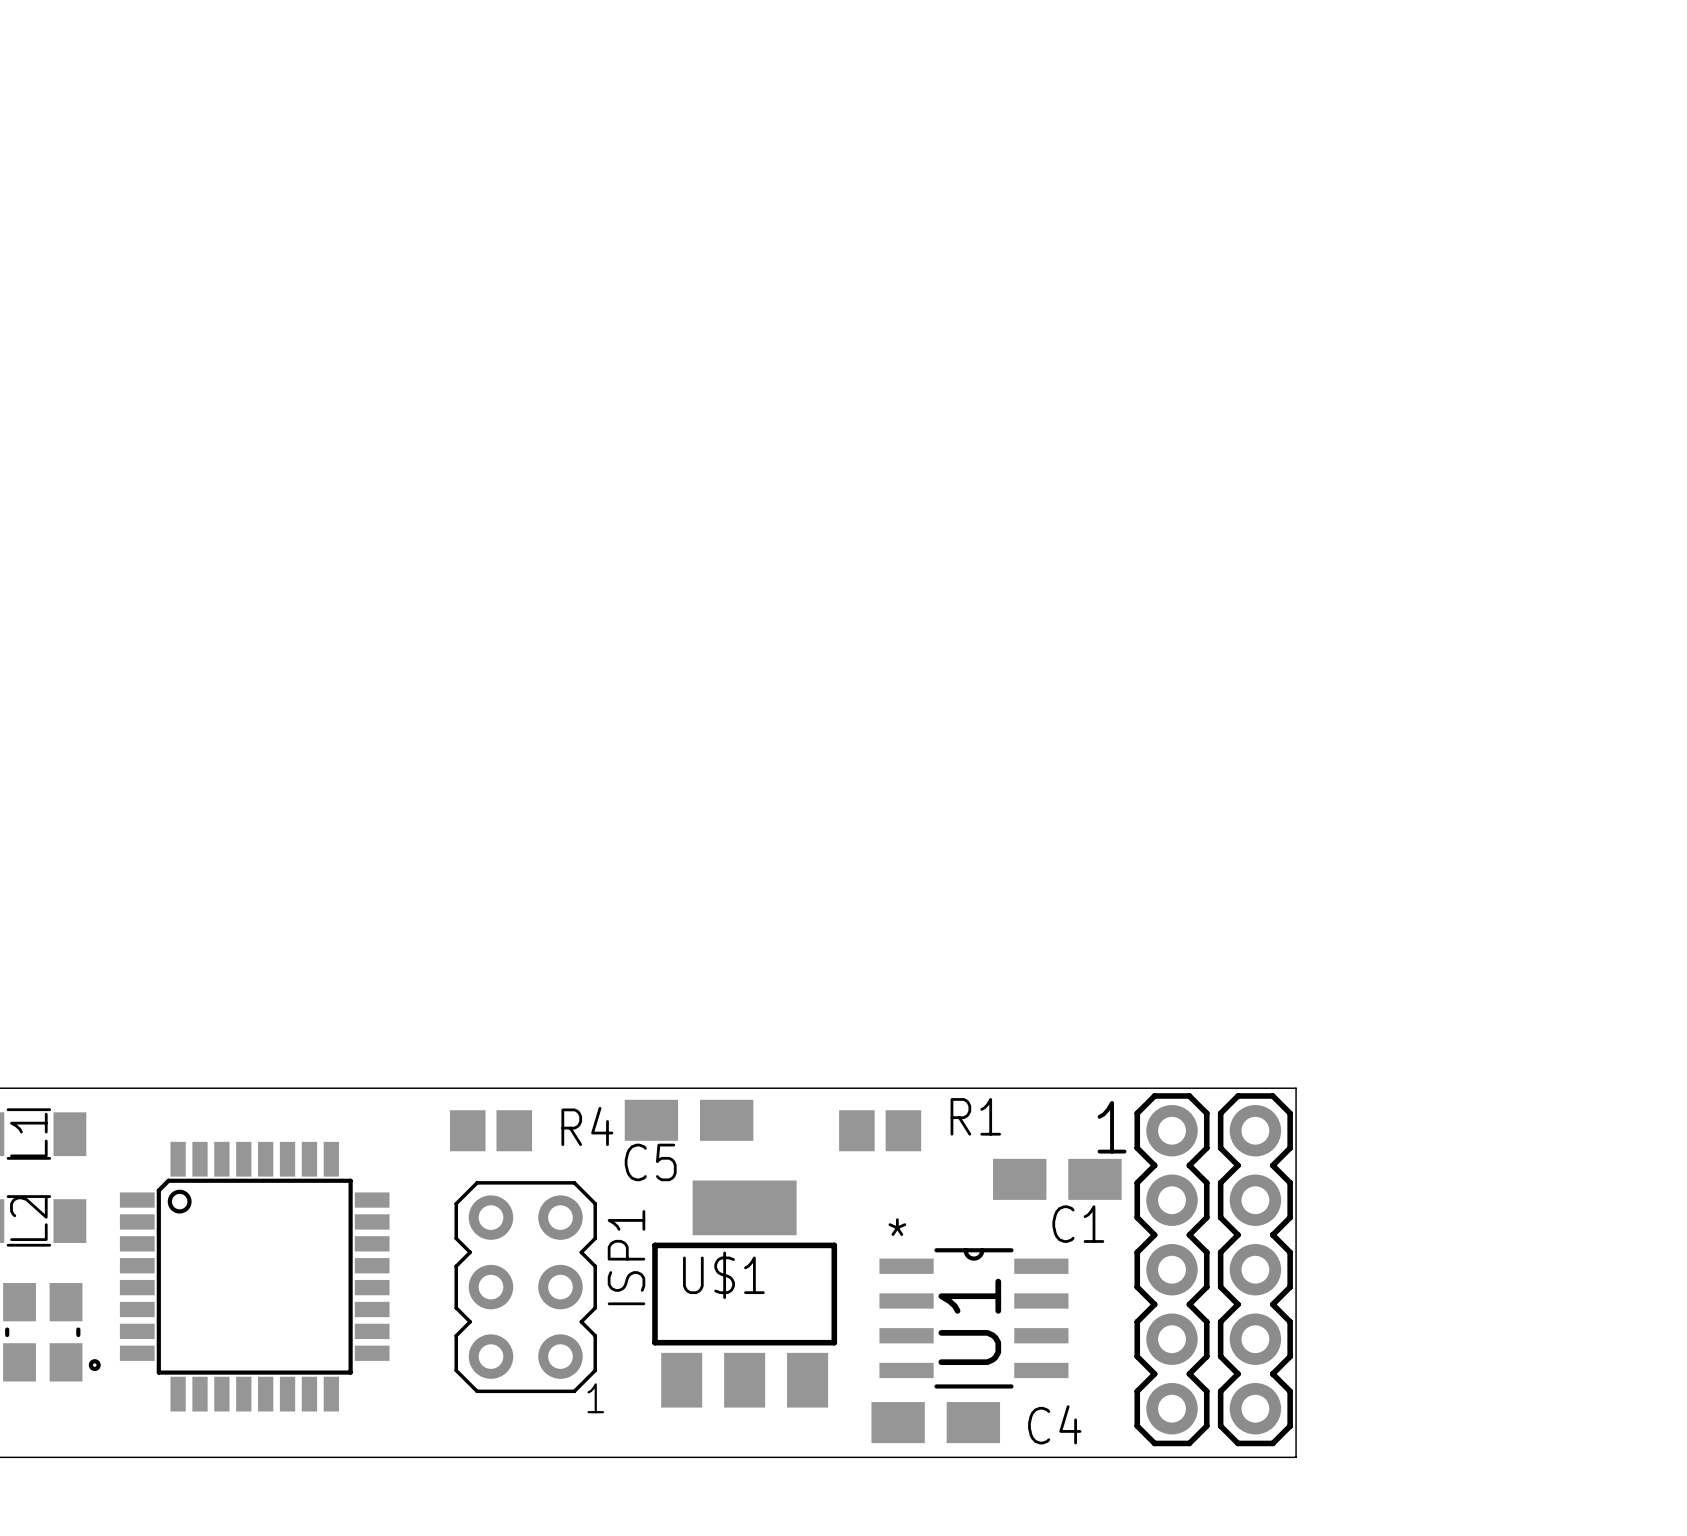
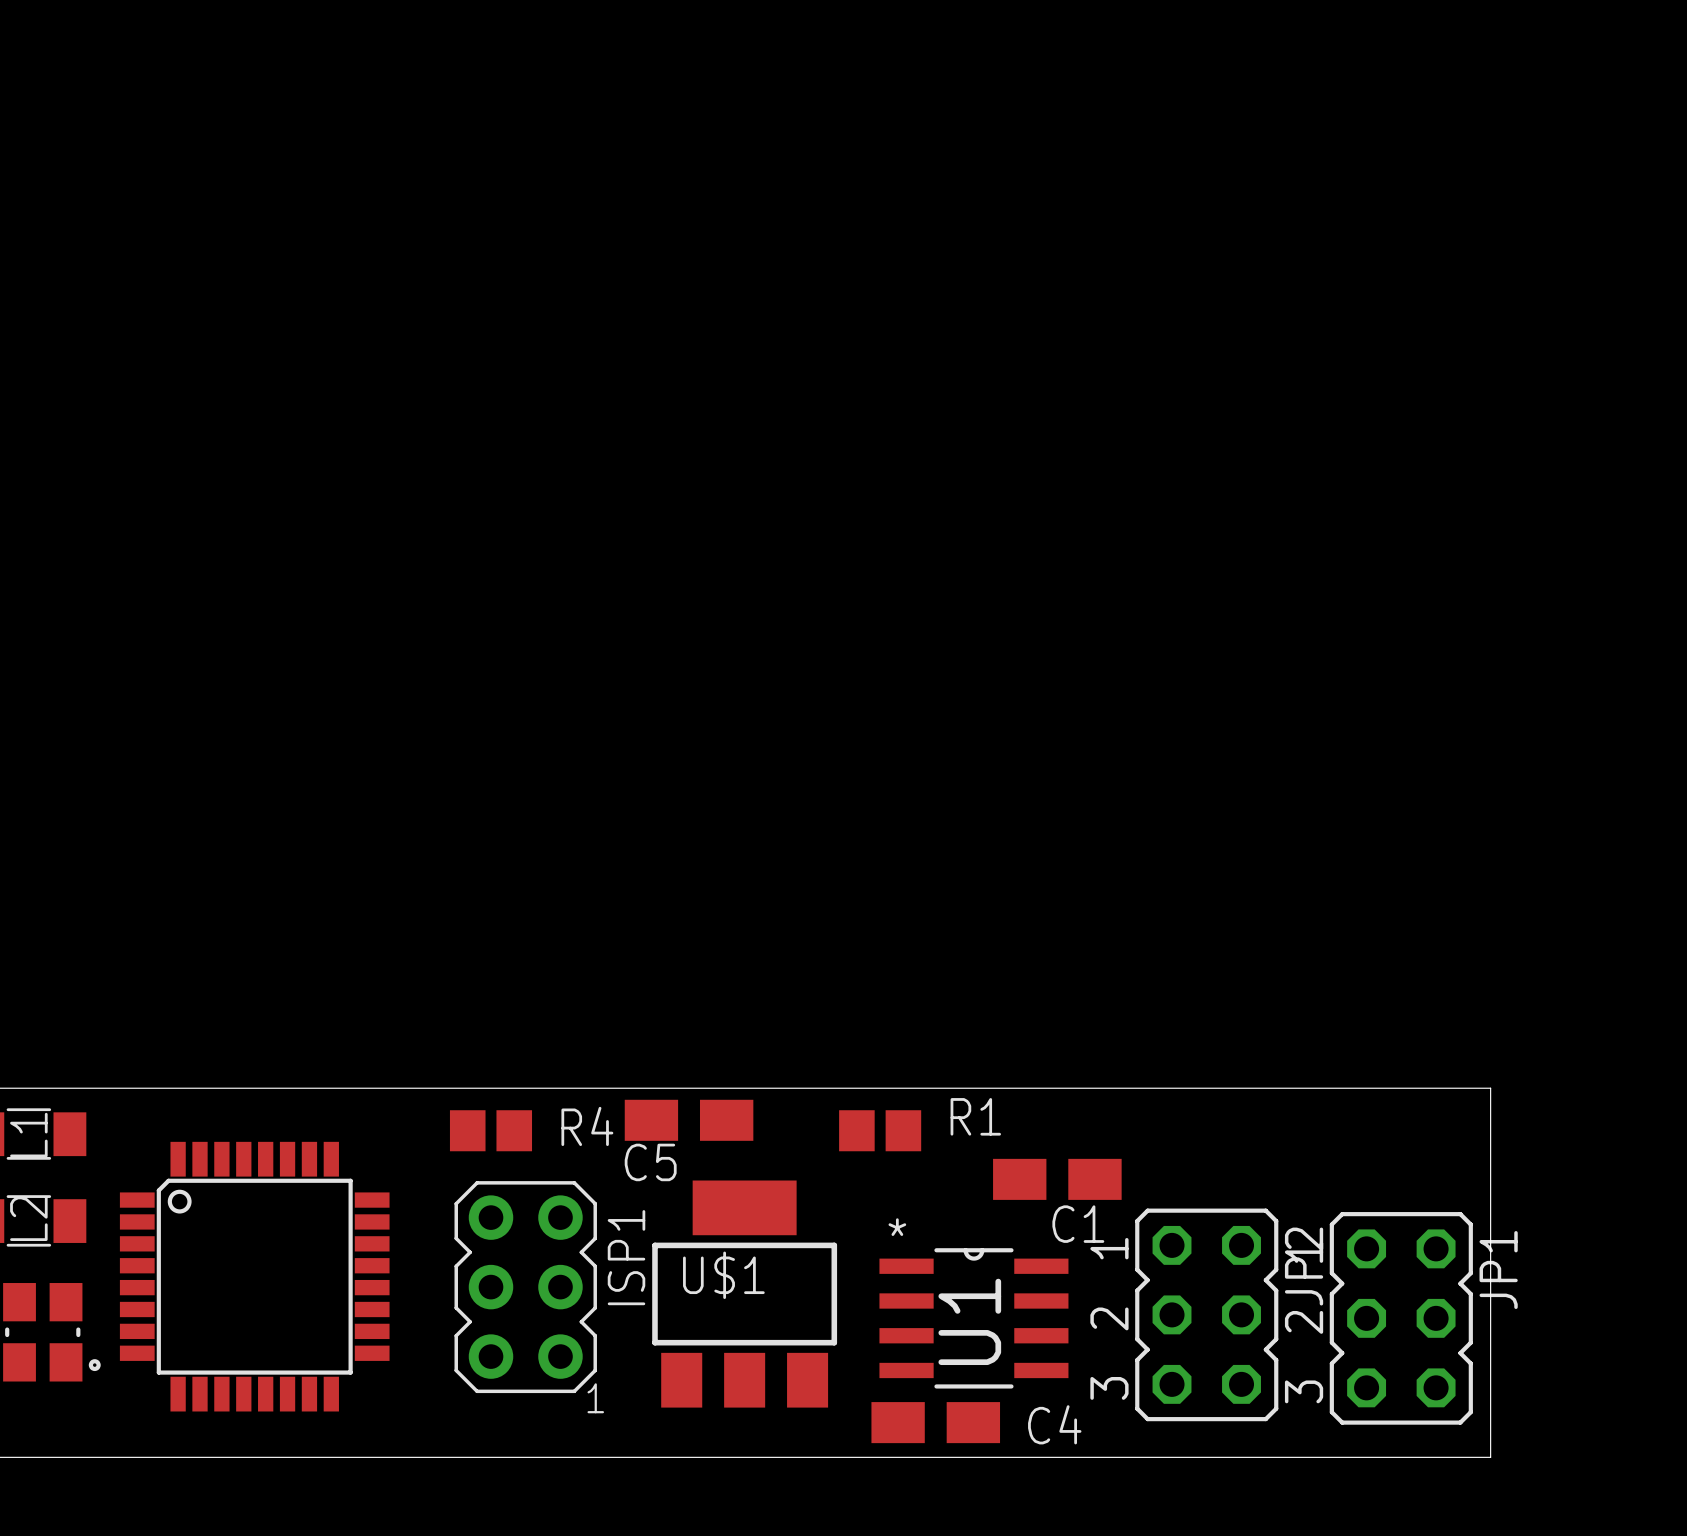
board edge: (1296, 1088) (1296, 1457) -> (1296, 1088) (1490, 1088) (1490, 1457) (1296, 1457)
text: 1 (1112, 1127) -> none
part: (1172, 1269) -> none
part: (1255, 1269) -> none
JP2: none -> (1206, 1314)
JP1: none -> (1401, 1318)

